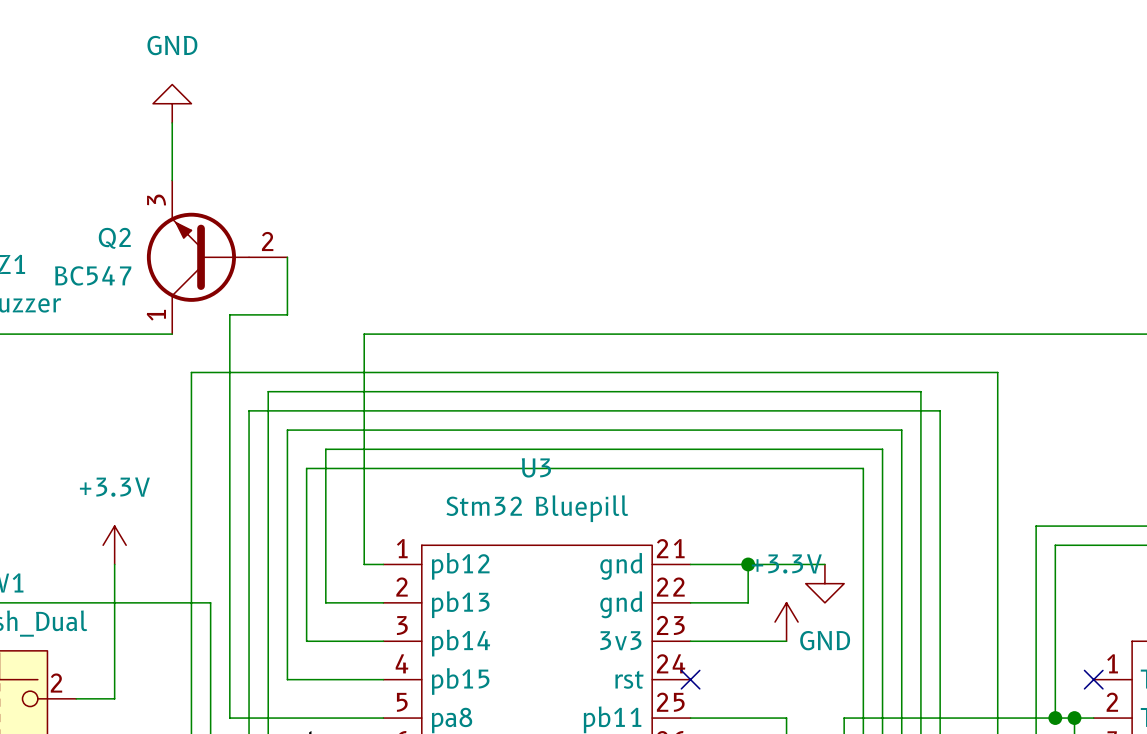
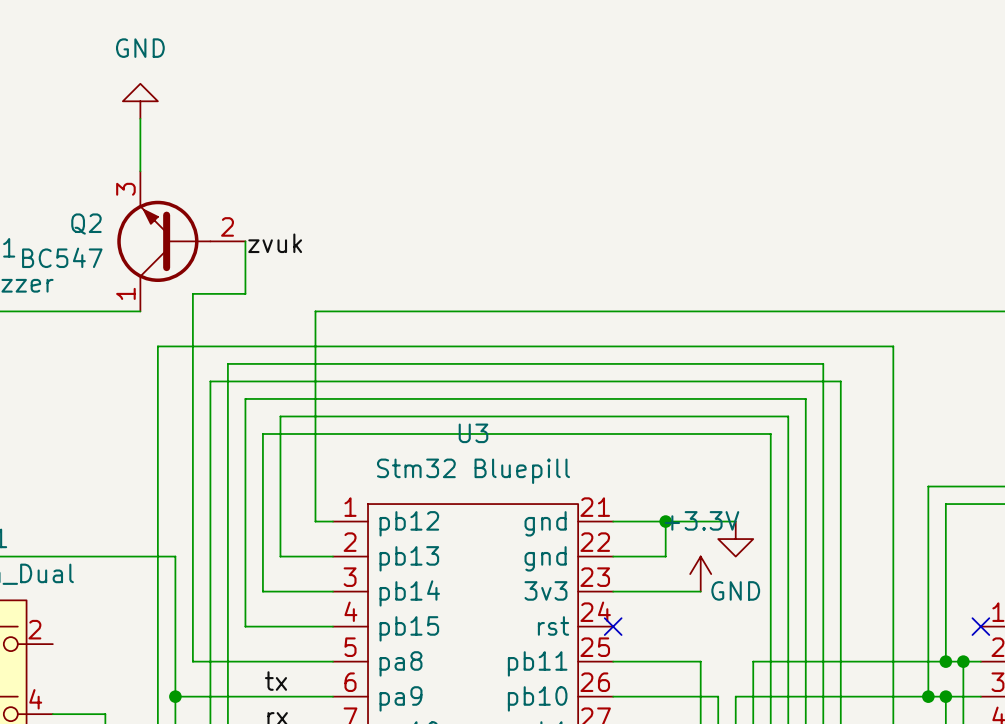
label: none -> zvuk (275, 243)
power symbol: +3.3V (114, 545) -> none
wire: (114, 564) (114, 698) (76, 698) -> none

